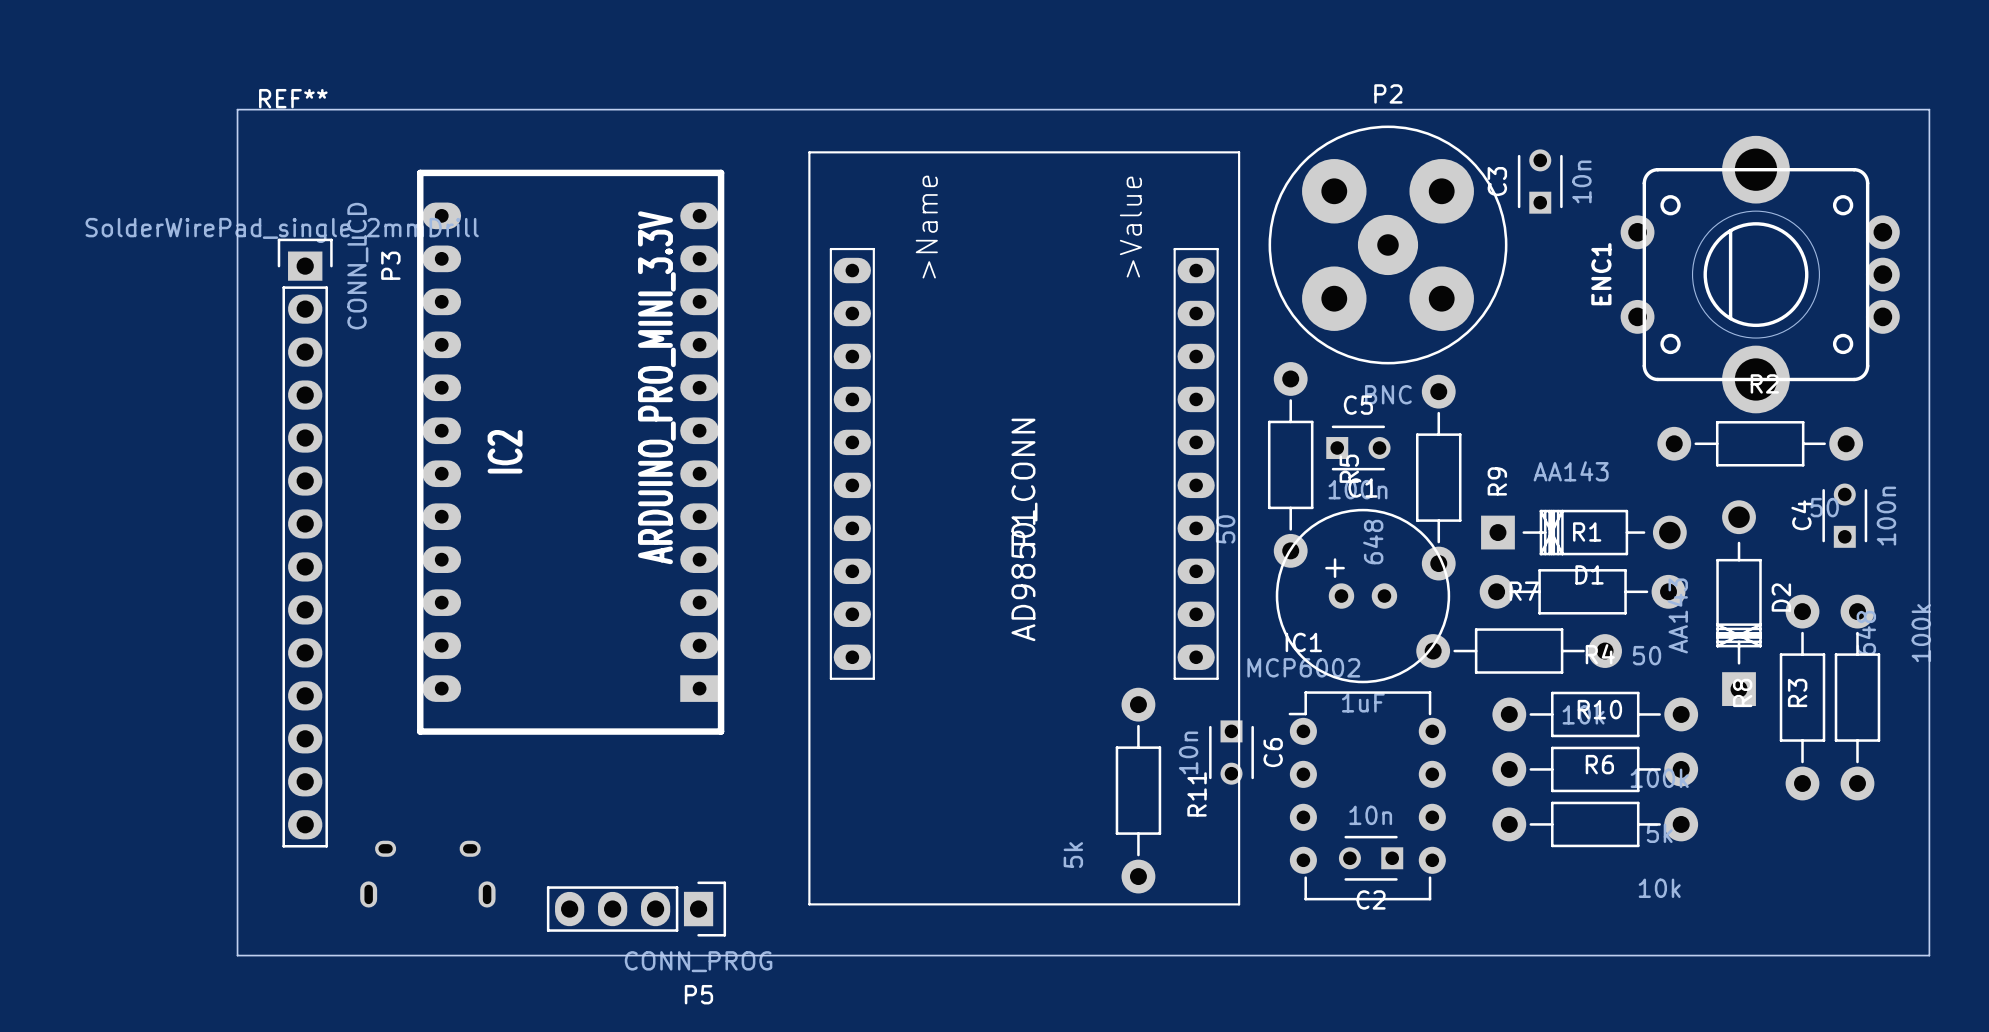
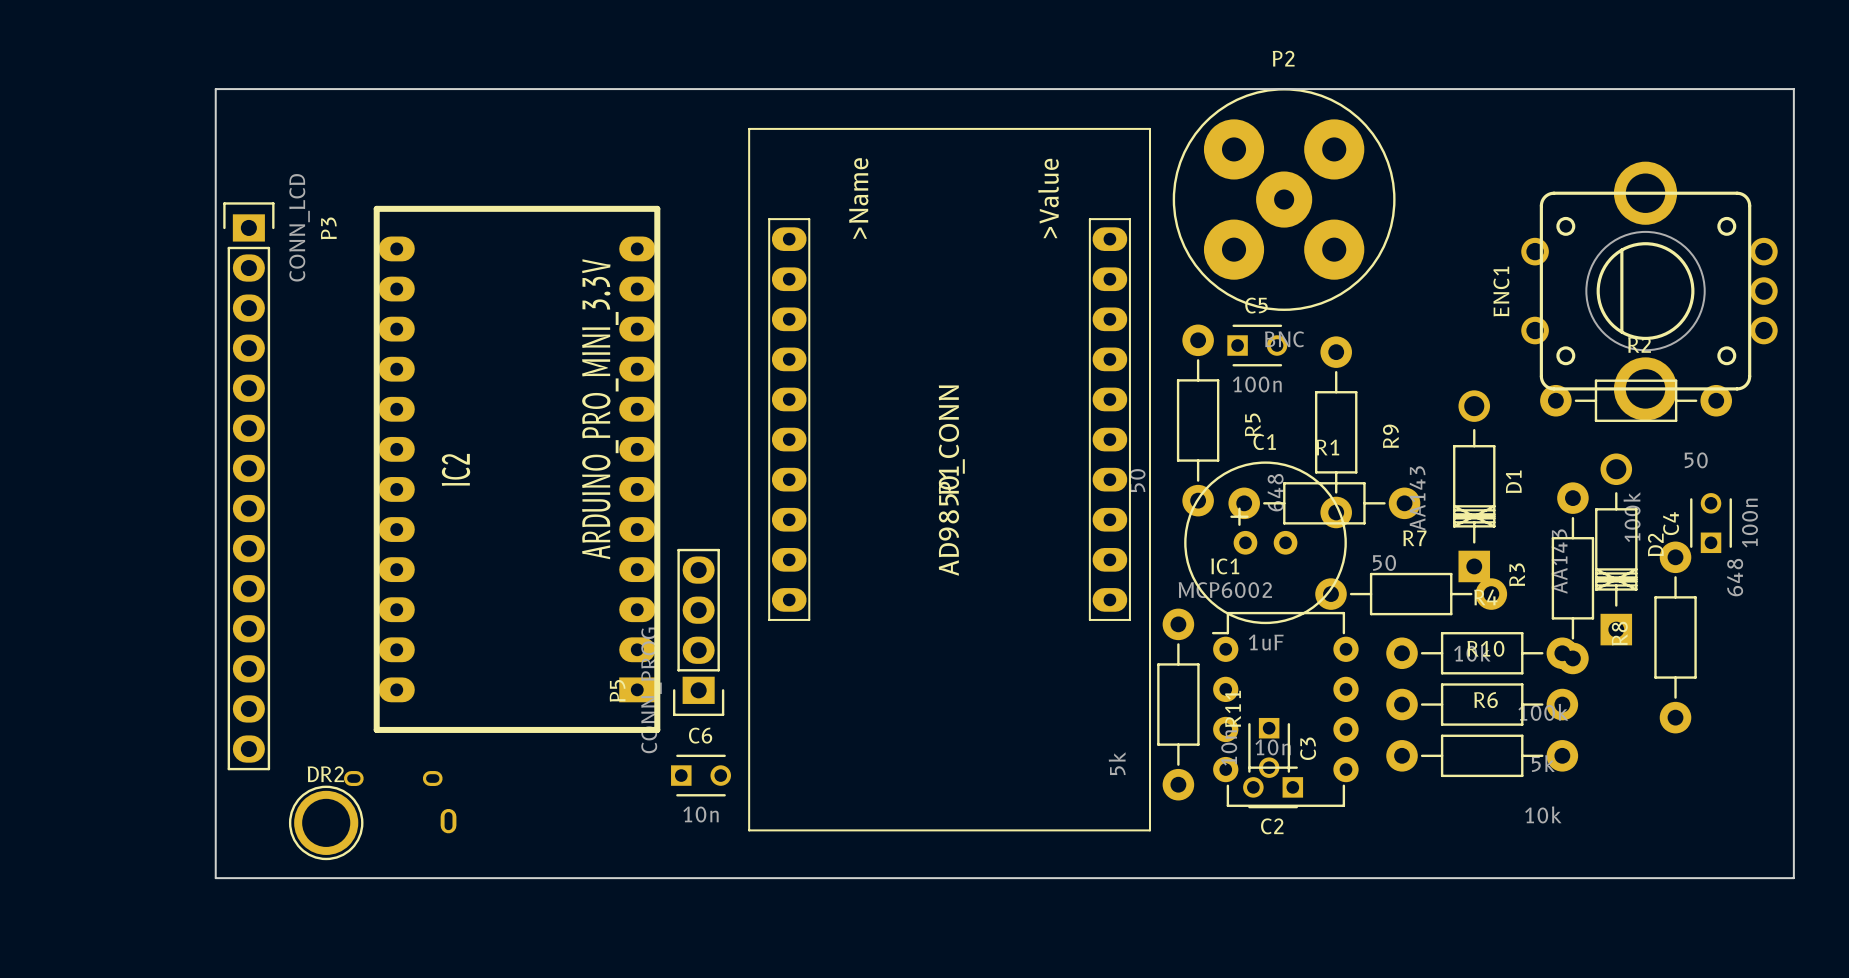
ENC1 footprint: [1620, 135, 1900, 414] -> [1521, 161, 1778, 421]
REF**: SolderWirePad_single_2mmDrill (282, 165) -> none
C3 rotation: 0° (1540, 181) -> 180° (1269, 747)
C3 position: (1540, 181) -> (1269, 747)
P2 position: (1388, 244) -> (1284, 199)
C5 position: (1358, 448) -> (1257, 345)
IC2 position: (570, 452) -> (517, 469)
C4 position: (1844, 515) -> (1711, 523)
D1 rotation: 0° (1583, 532) -> 90° counterclockwise (1474, 486)
P3 position: (305, 543) -> (248, 486)
R1 position: (1582, 591) -> (1324, 503)
R3 position: (1857, 697) -> (1572, 578)
C6 rotation: 0° (1231, 752) -> 90° counterclockwise (701, 775)
C6 position: (1231, 752) -> (701, 775)
R11 position: (1138, 790) -> (1178, 704)
IC1 position: (1367, 795) -> (1285, 709)
DR2: none -> (326, 822)
P5 rotation: 0° (636, 909) -> 90° clockwise (698, 632)
P5 position: (636, 909) -> (698, 632)

